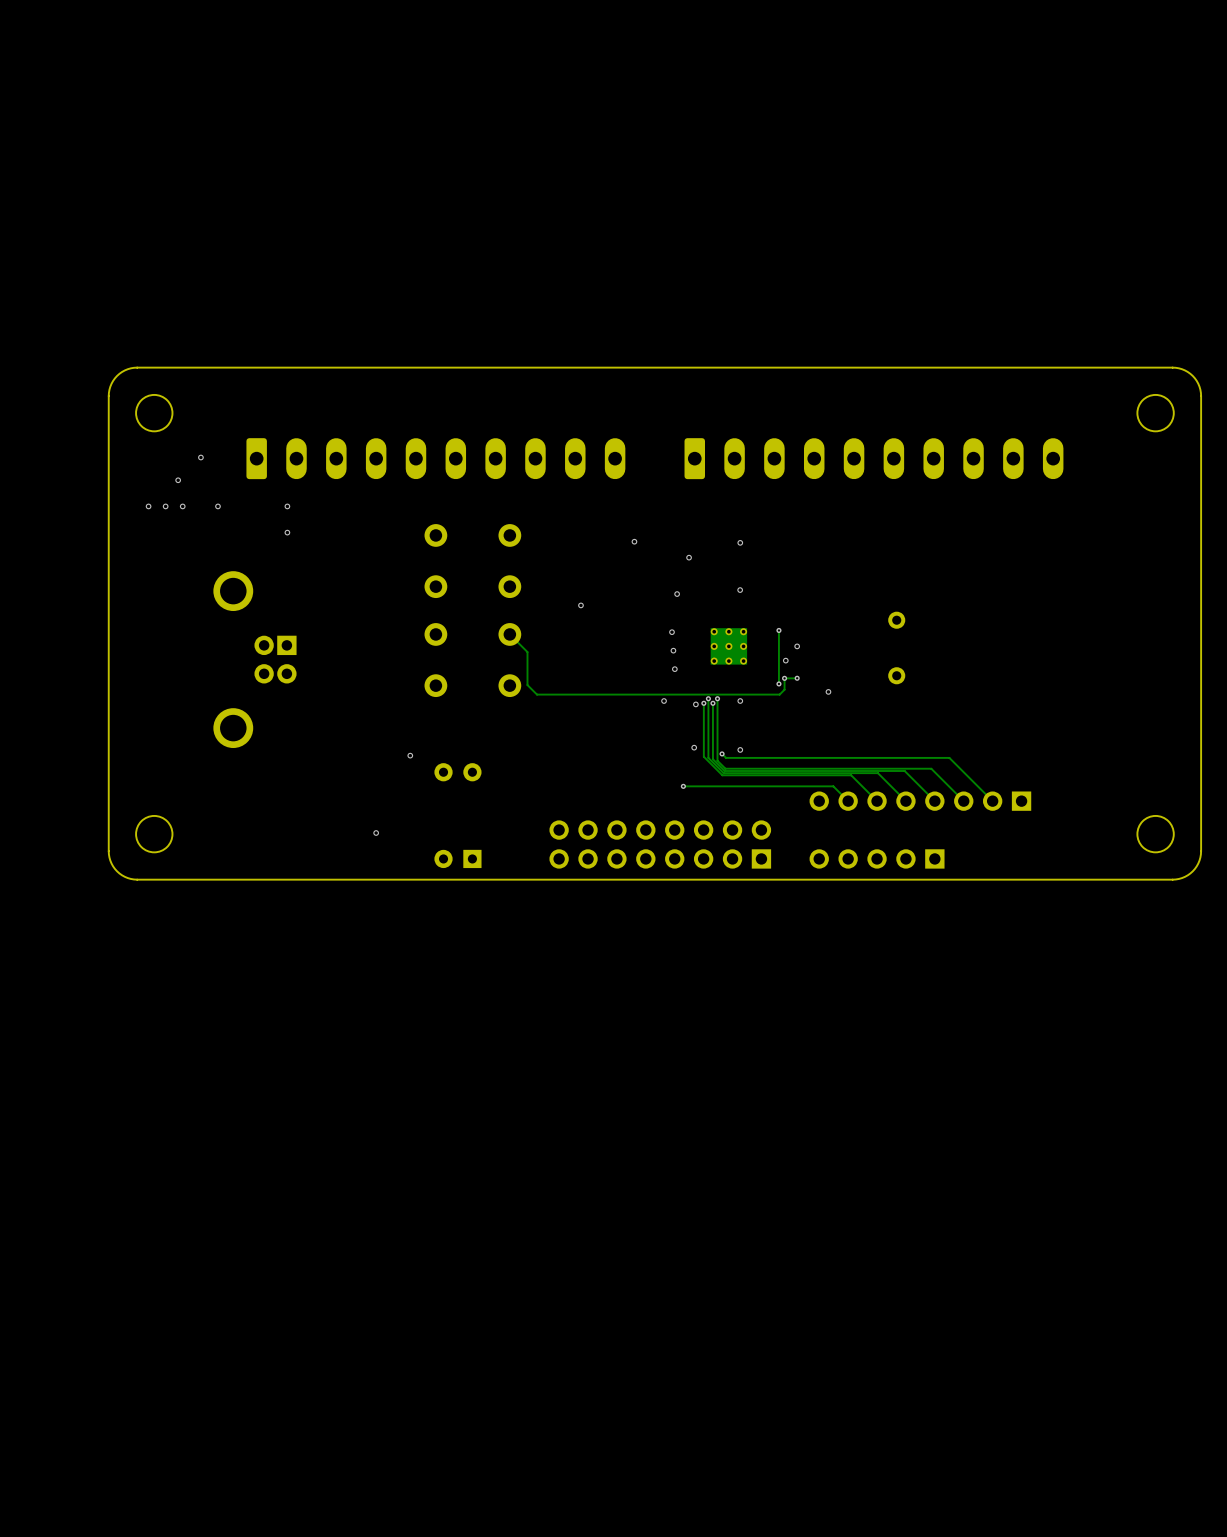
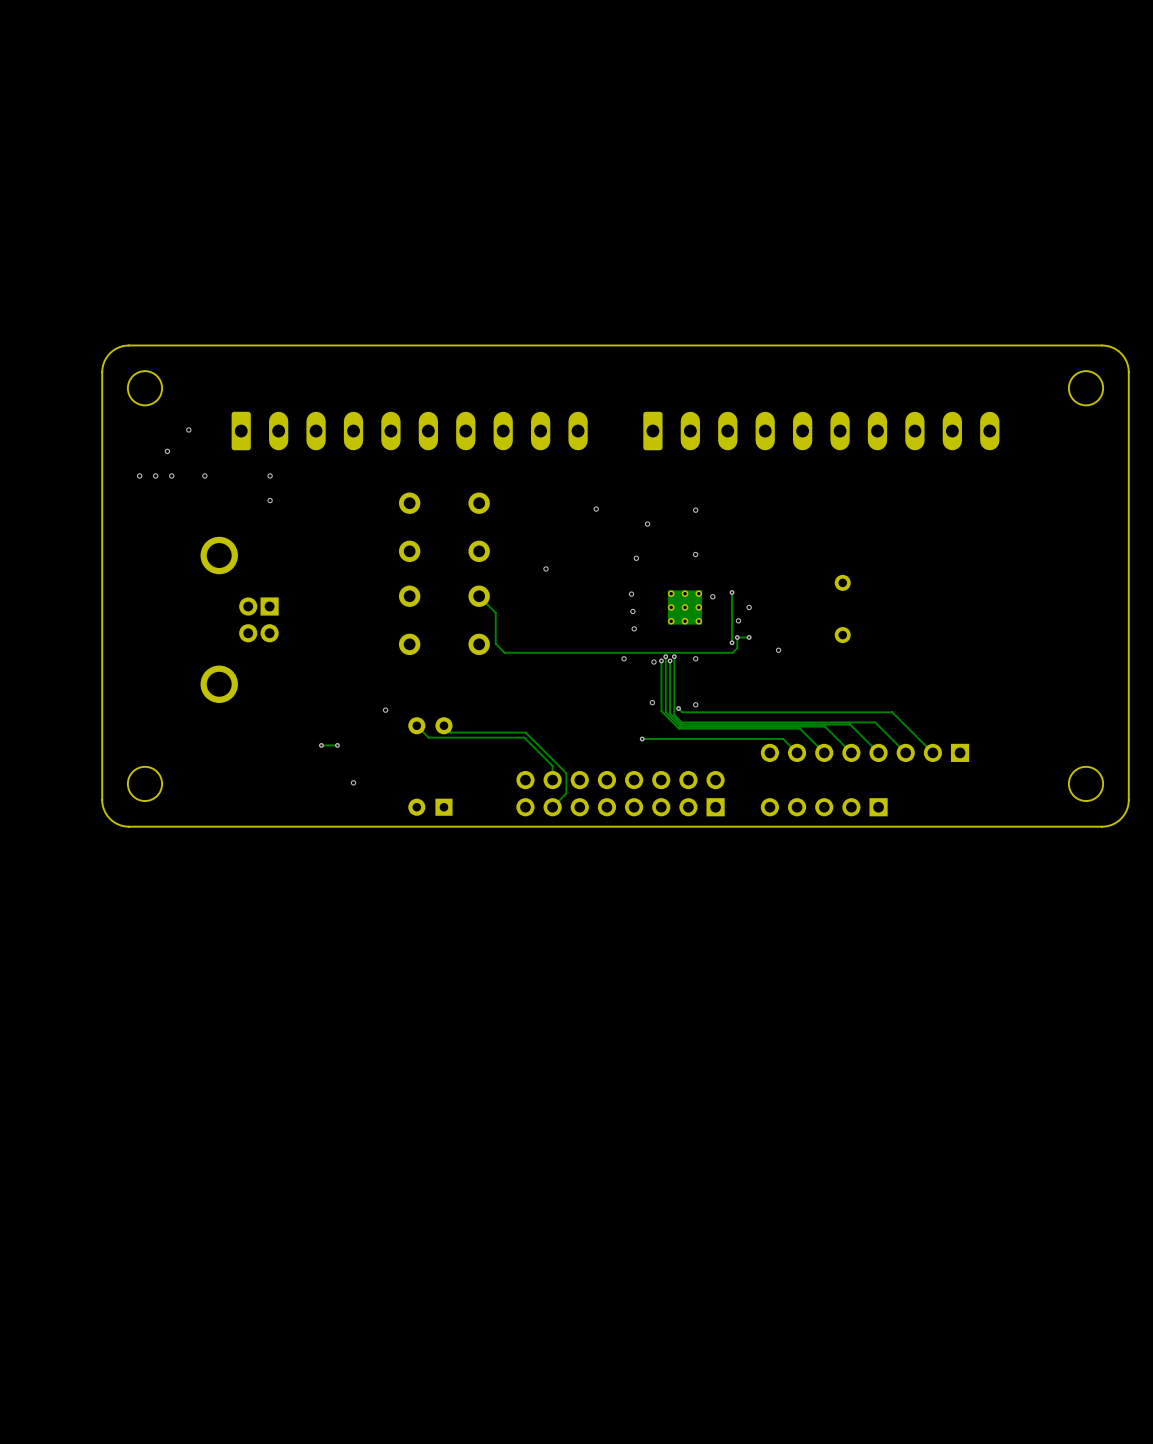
via: none -> (712, 596)
track: none -> (416, 725) (428, 737) (524, 737) (552, 765) (552, 780)
track: none -> (443, 725) (450, 732) (525, 732) (566, 773) (566, 793) (552, 807)
via: none -> (321, 745)
track: none -> (337, 745) (321, 745)
via: none -> (337, 745)

